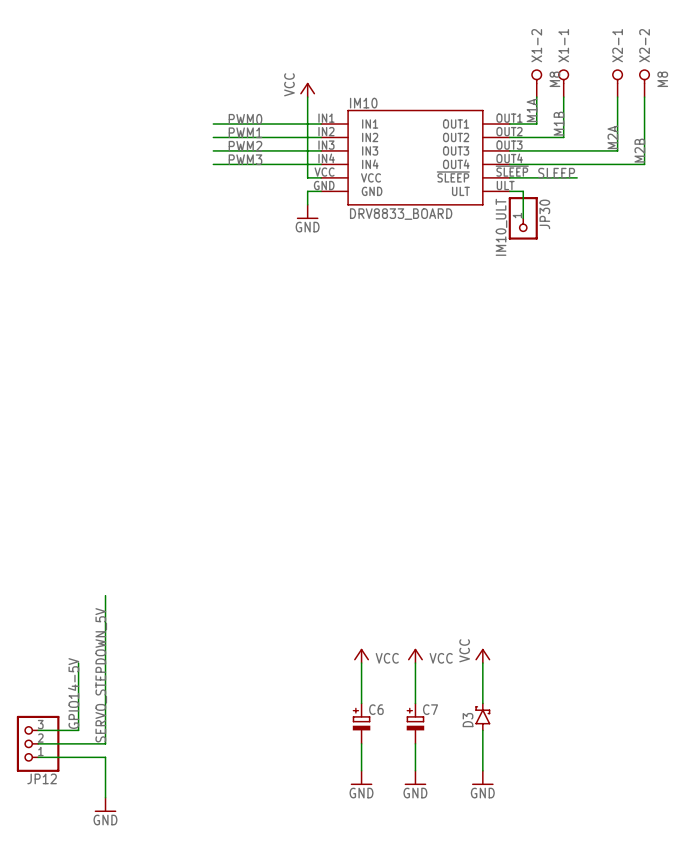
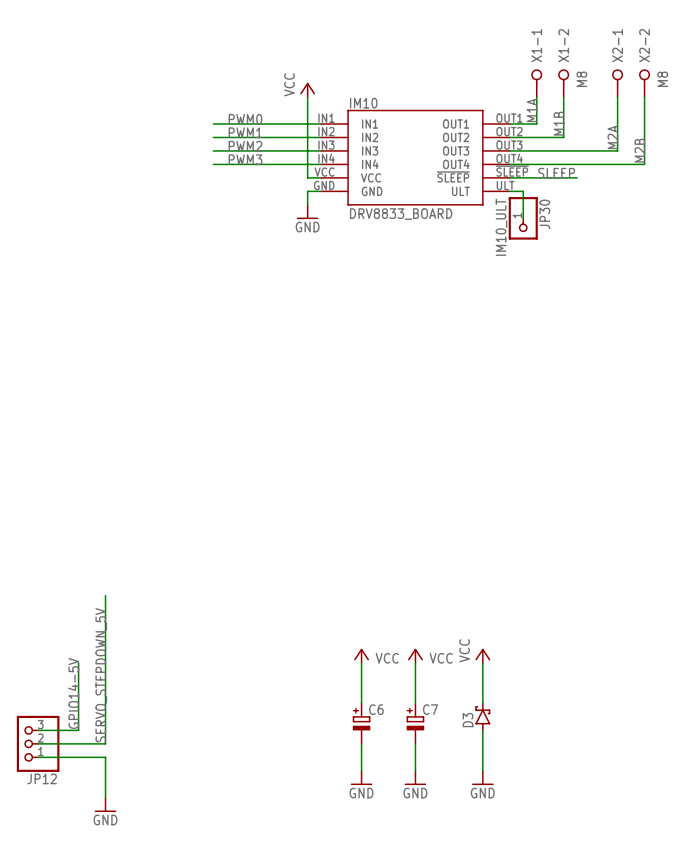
X1-2 name: X1-2 (536, 45) -> X1-1 (536, 45)
X1-1 name: X1-1 (563, 45) -> X1-2 (563, 45)
X1-2 value: M8 (554, 79) -> none
X1-1 value: none -> M8 (581, 79)

